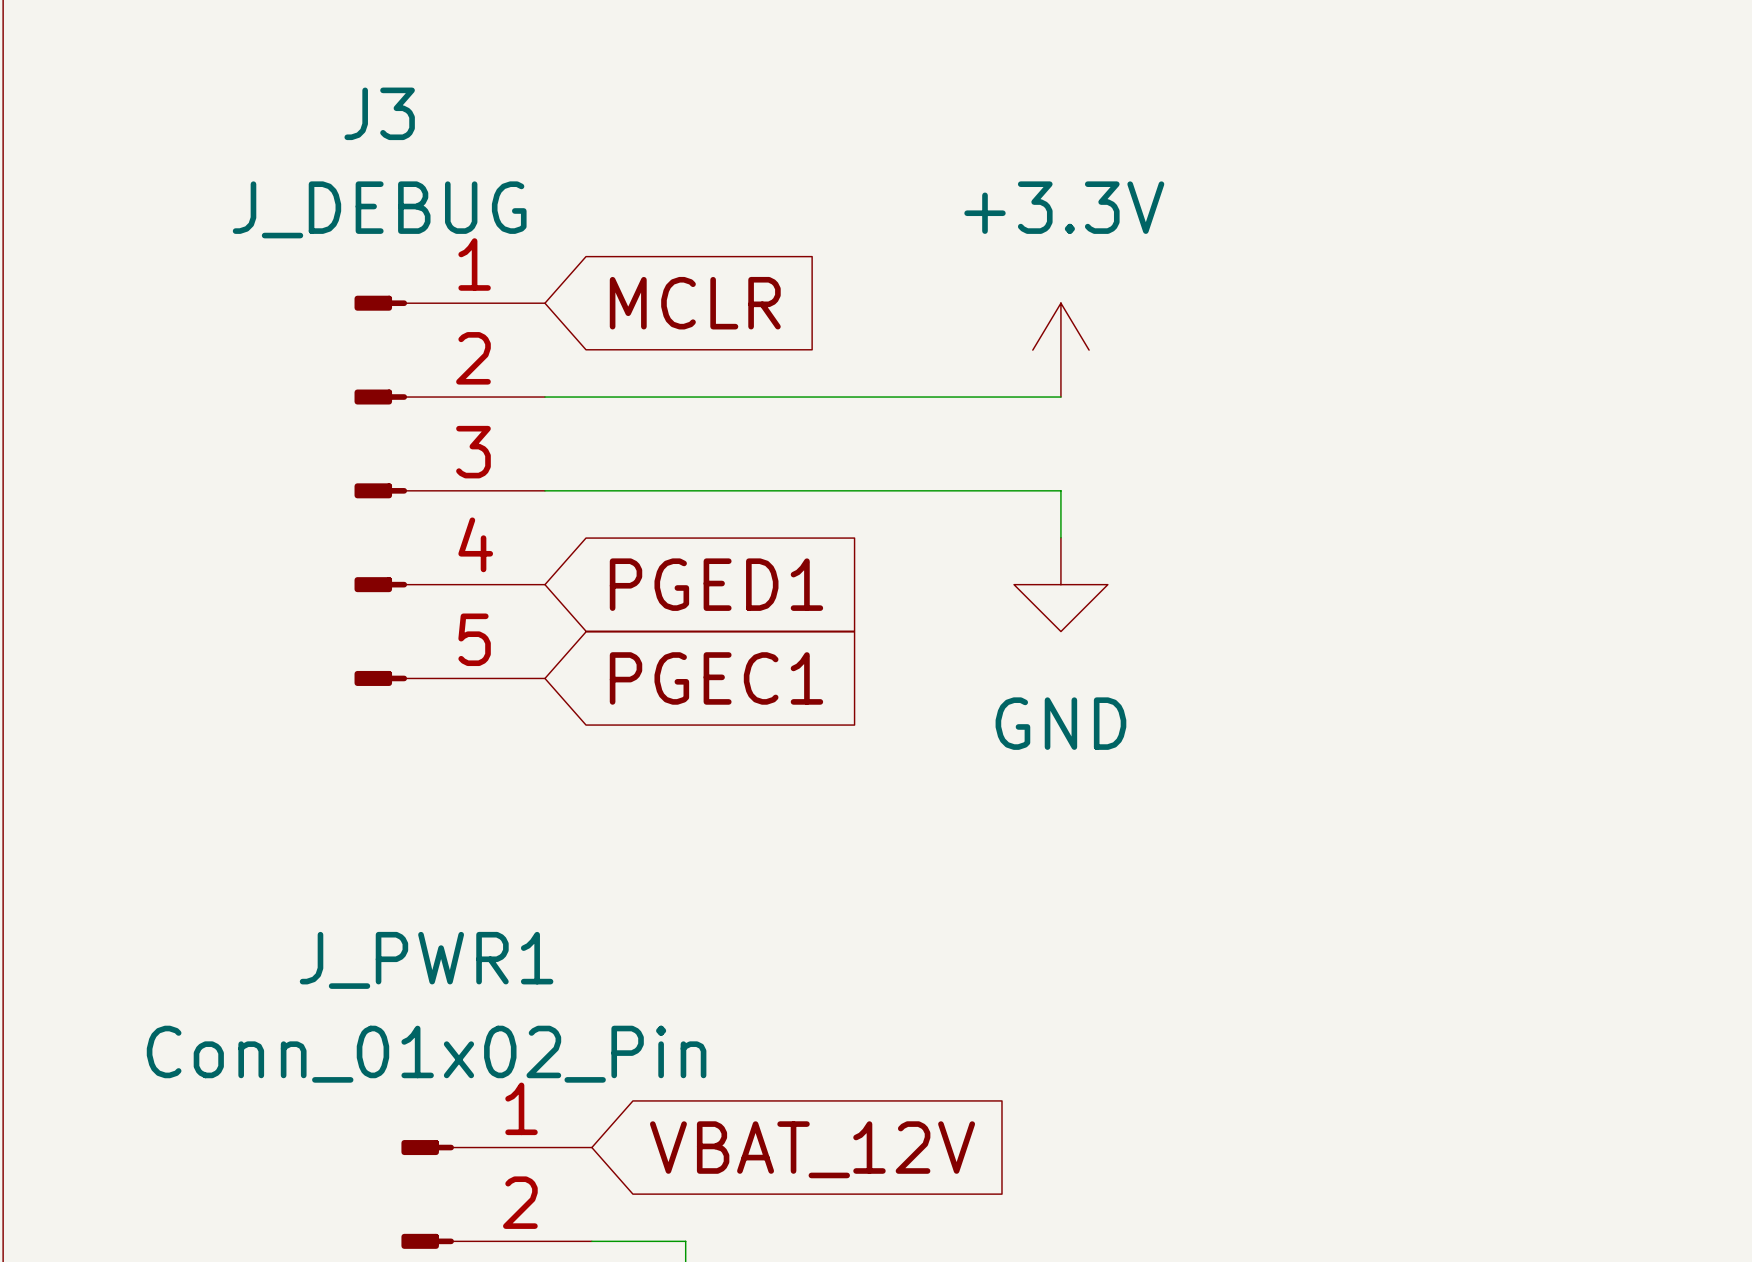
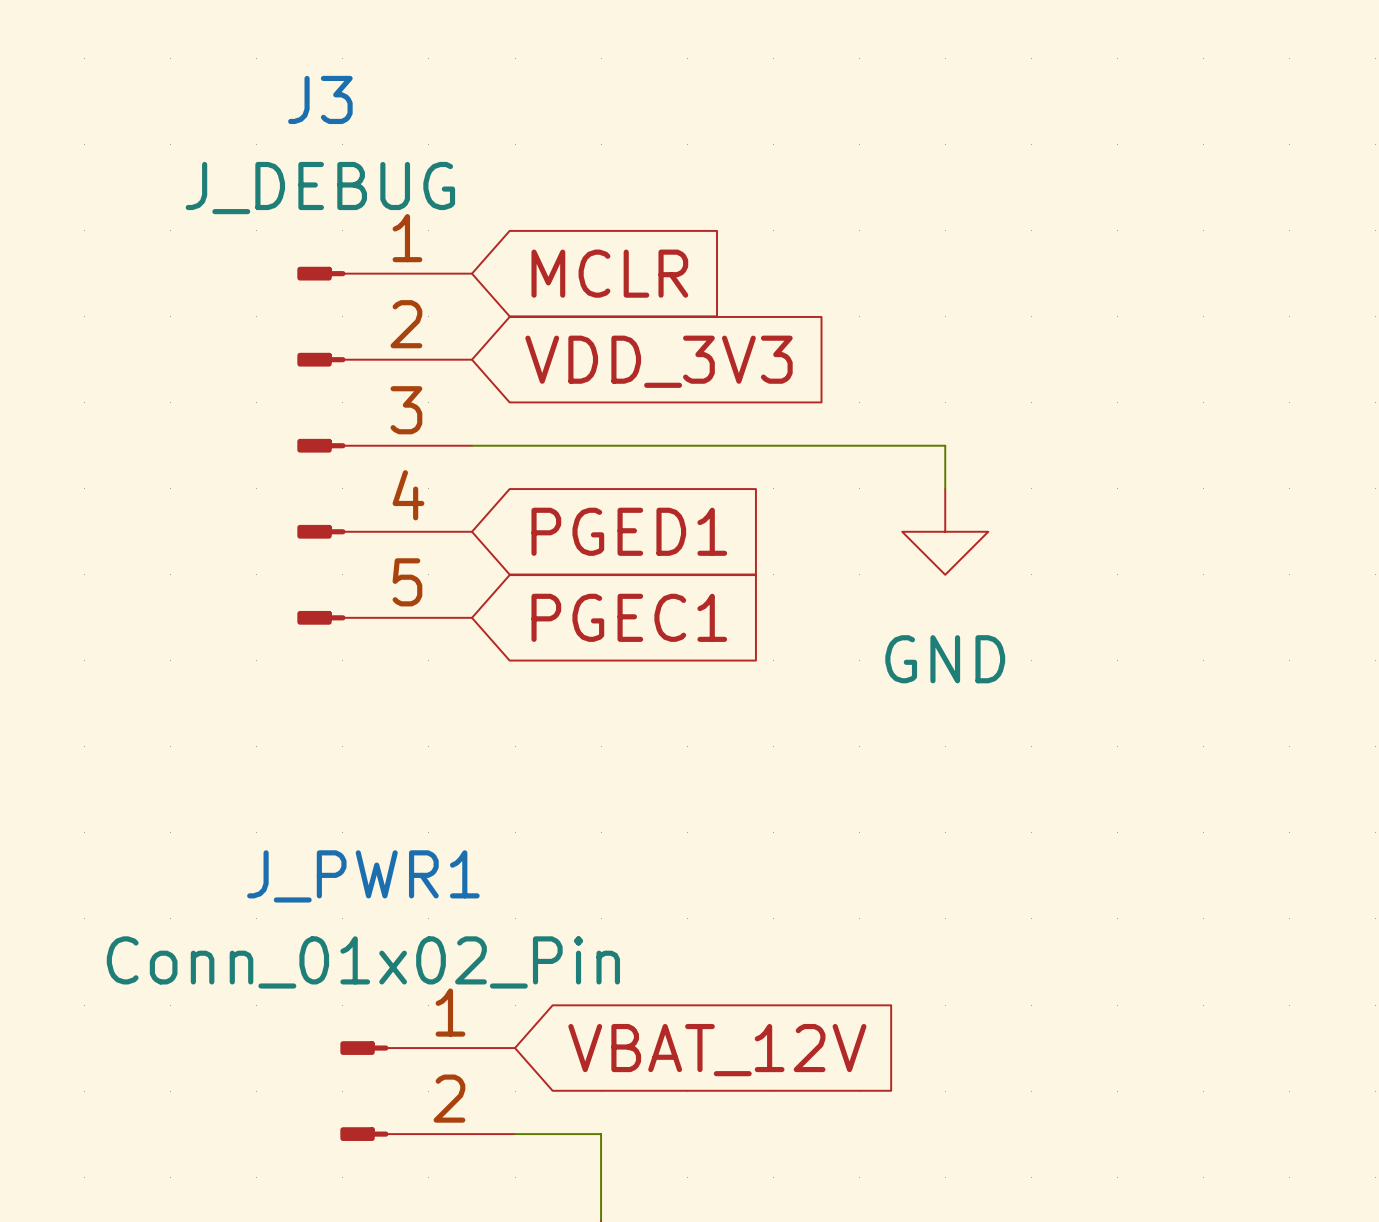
power symbol: +3.3V (1060, 350) -> none
wire: (544, 397) (1060, 397) -> none
global label: none -> VDD_3V3 (659, 361)

